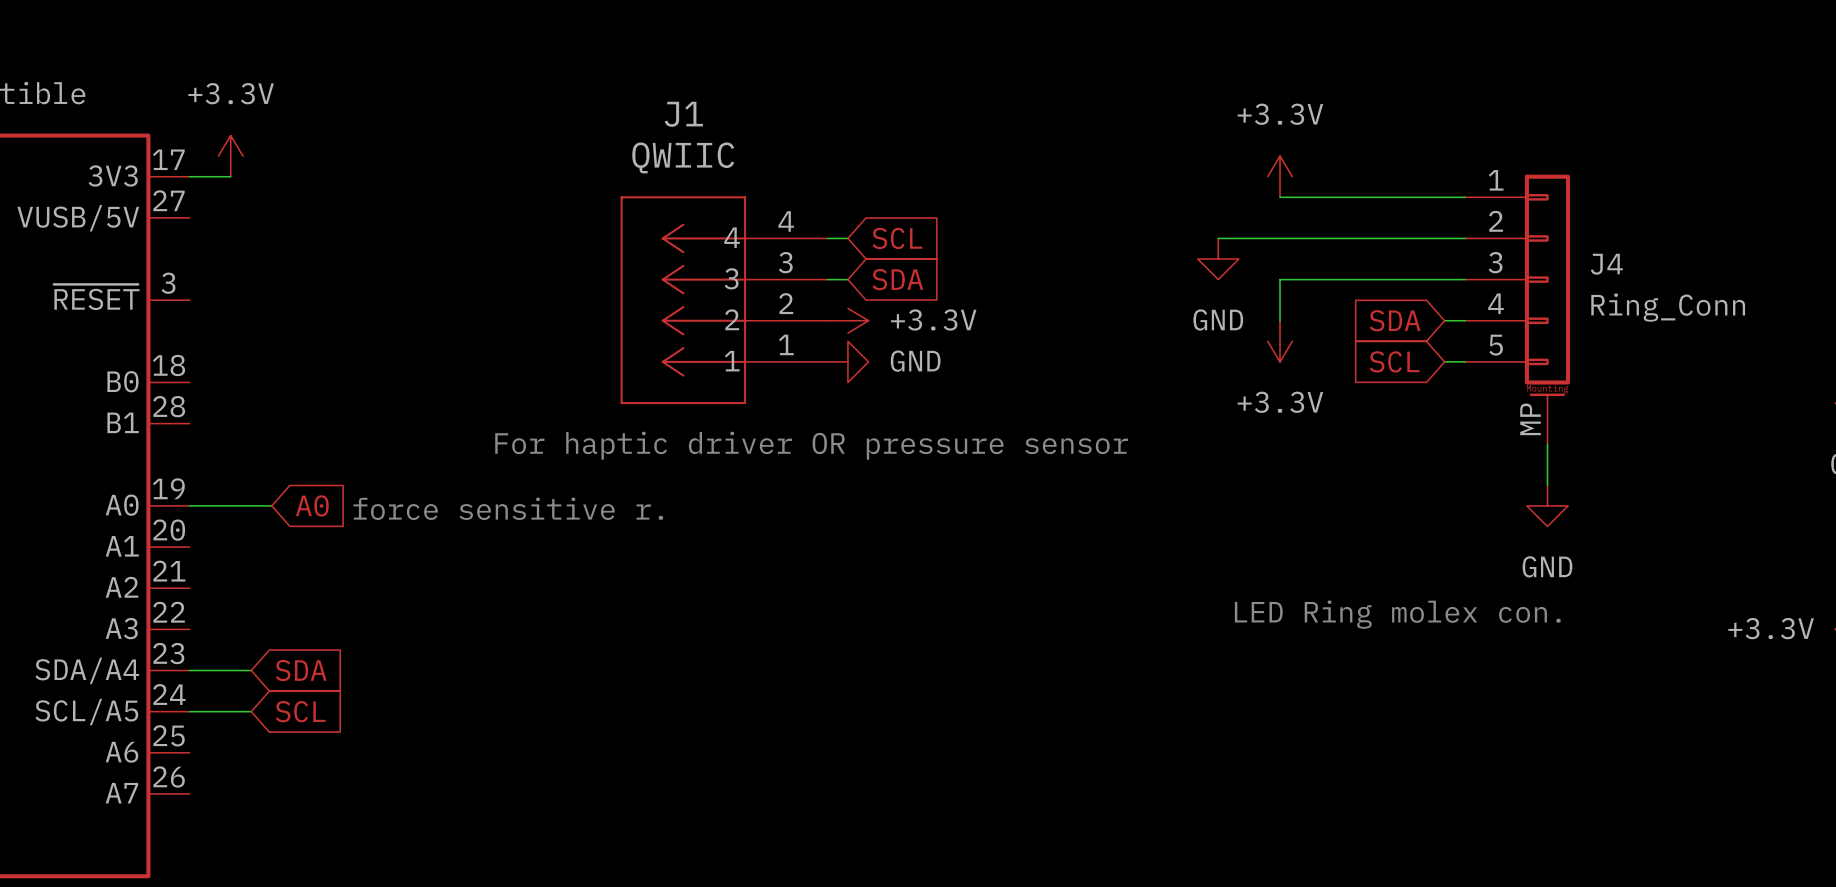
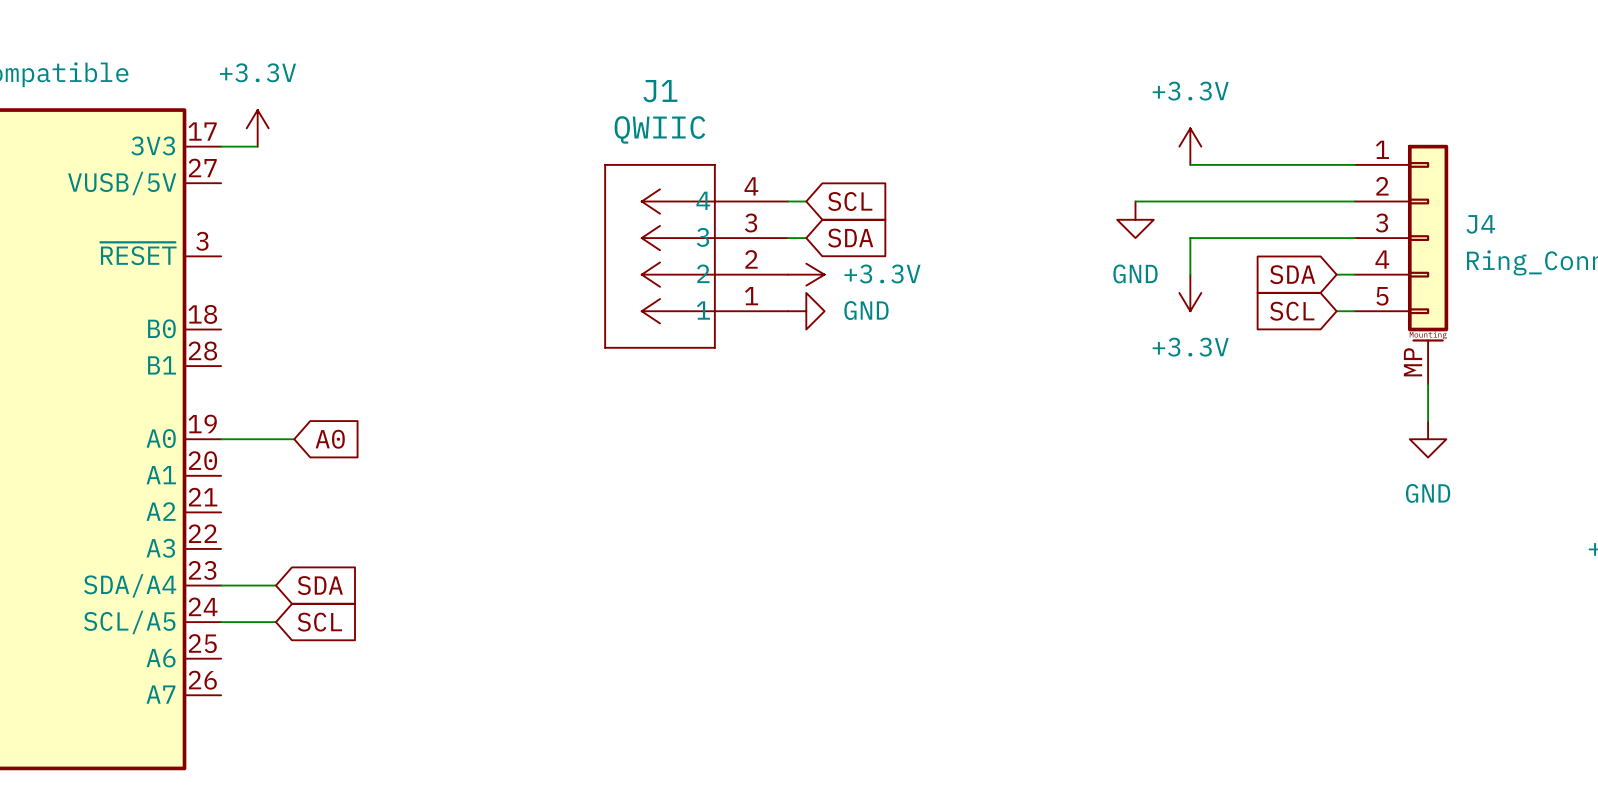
text: For haptic driver OR pressure sensor (811, 445) -> none
text: force sensitive r. (508, 508) -> none
text: LED Ring molex con. (1397, 614) -> none

